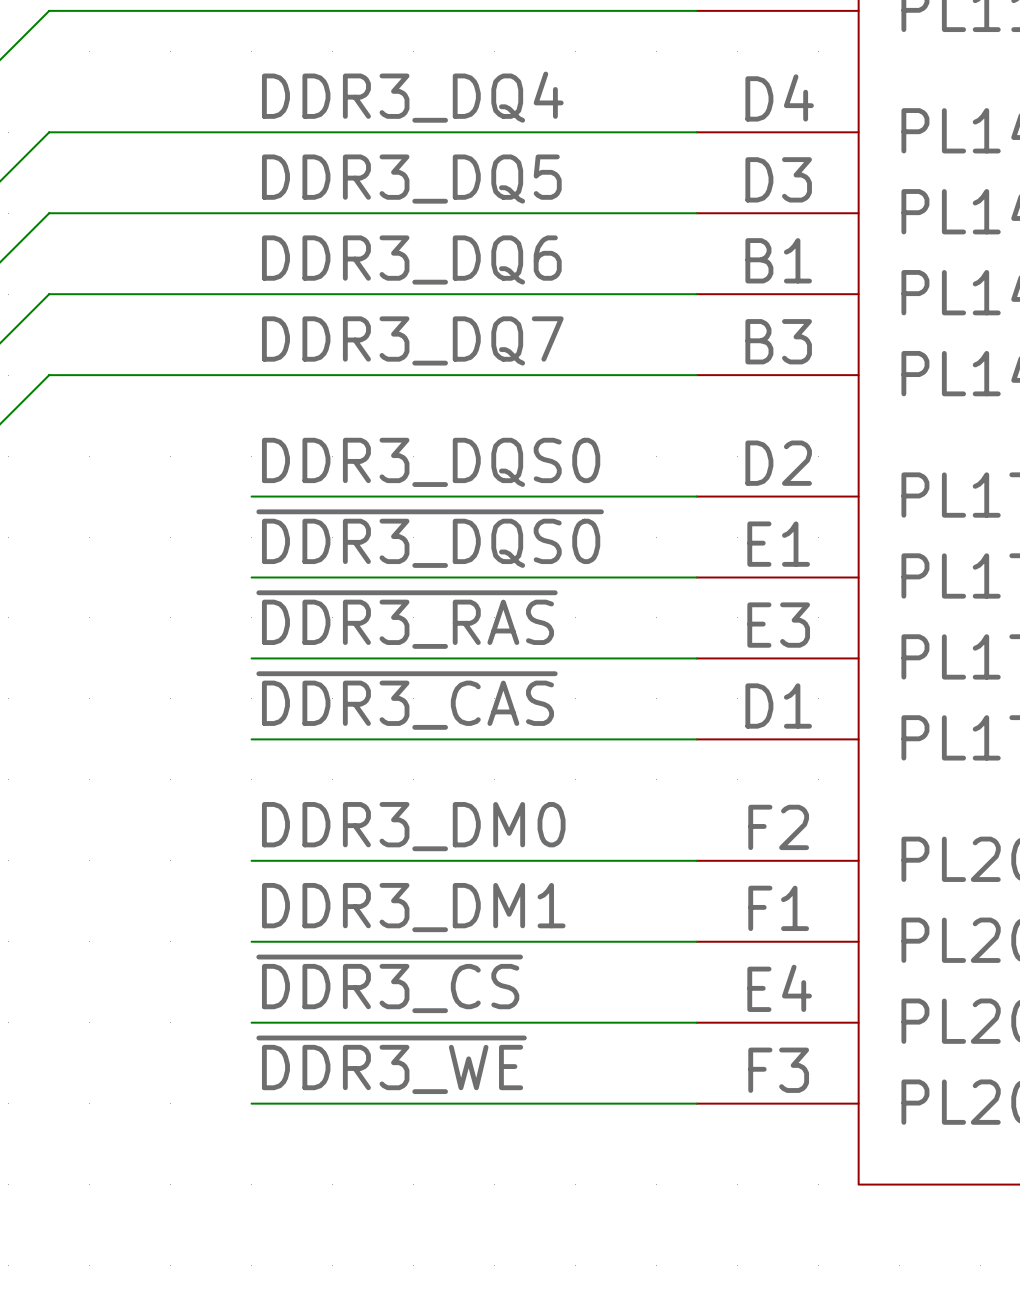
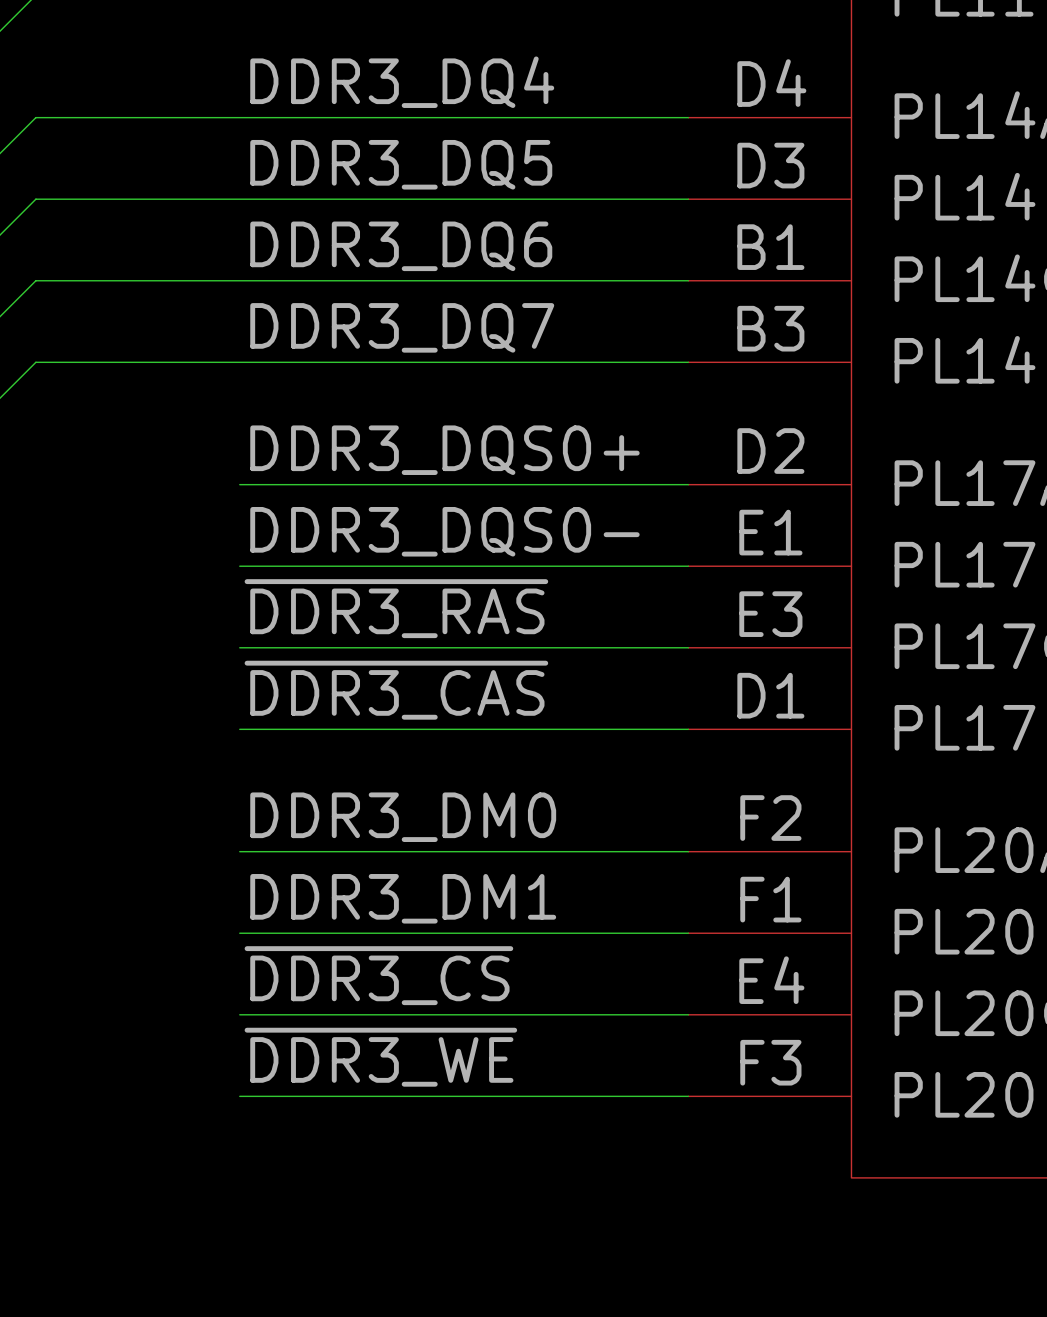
label: DDR3_DQS0 (431, 462) -> DDR3_DQS0+ (444, 450)
label: ~{DDR3_DQS0} (430, 538) -> DDR3_DQS0- (444, 531)

